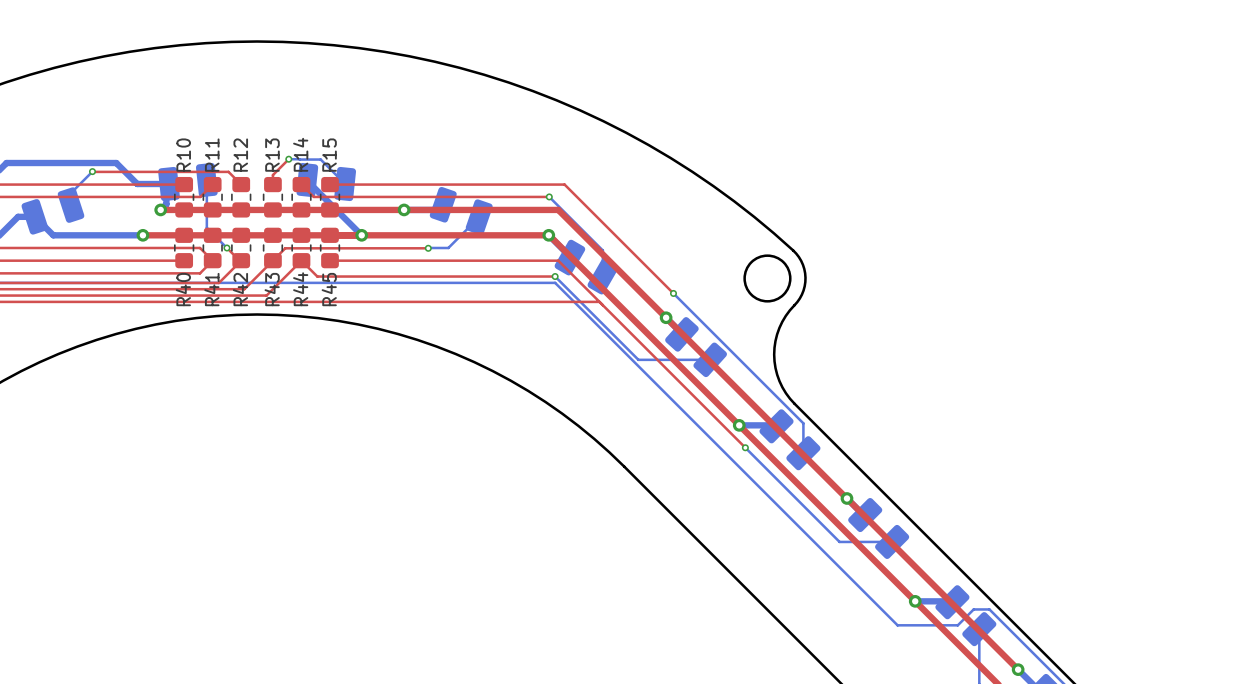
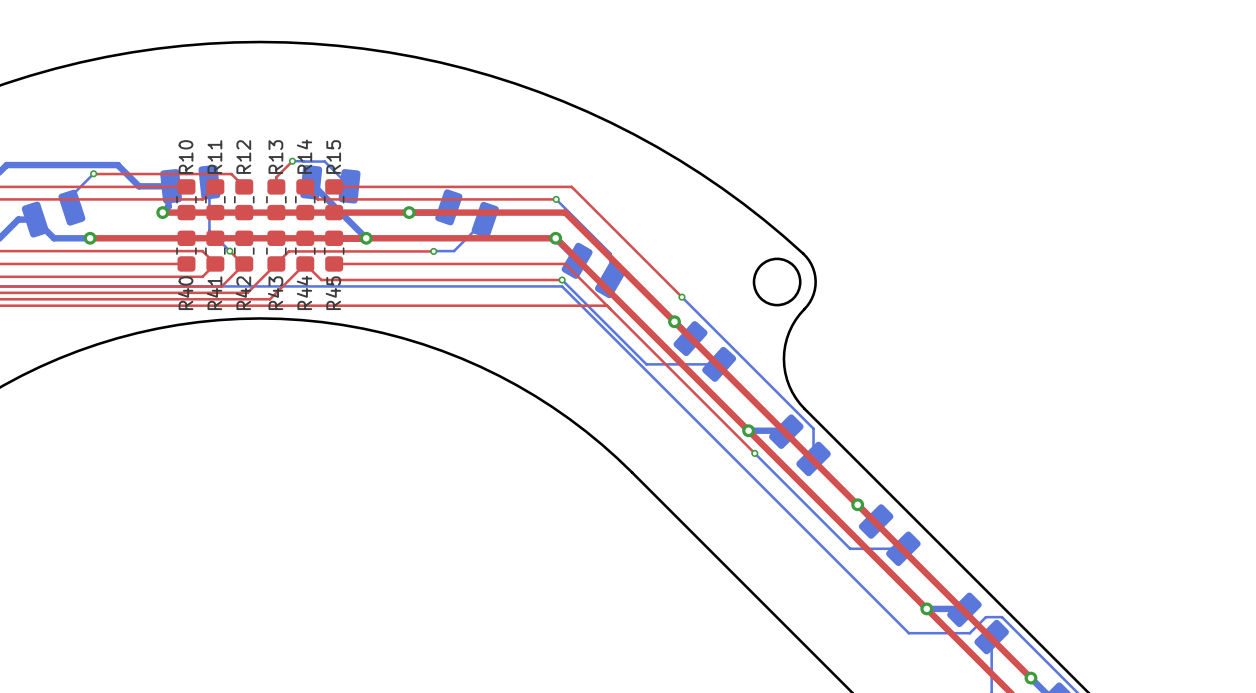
top track: none -> (90, 238) (144, 238)
bottom track: (89, 235) (142, 235) -> none
via position: (142, 235) -> (90, 238)

